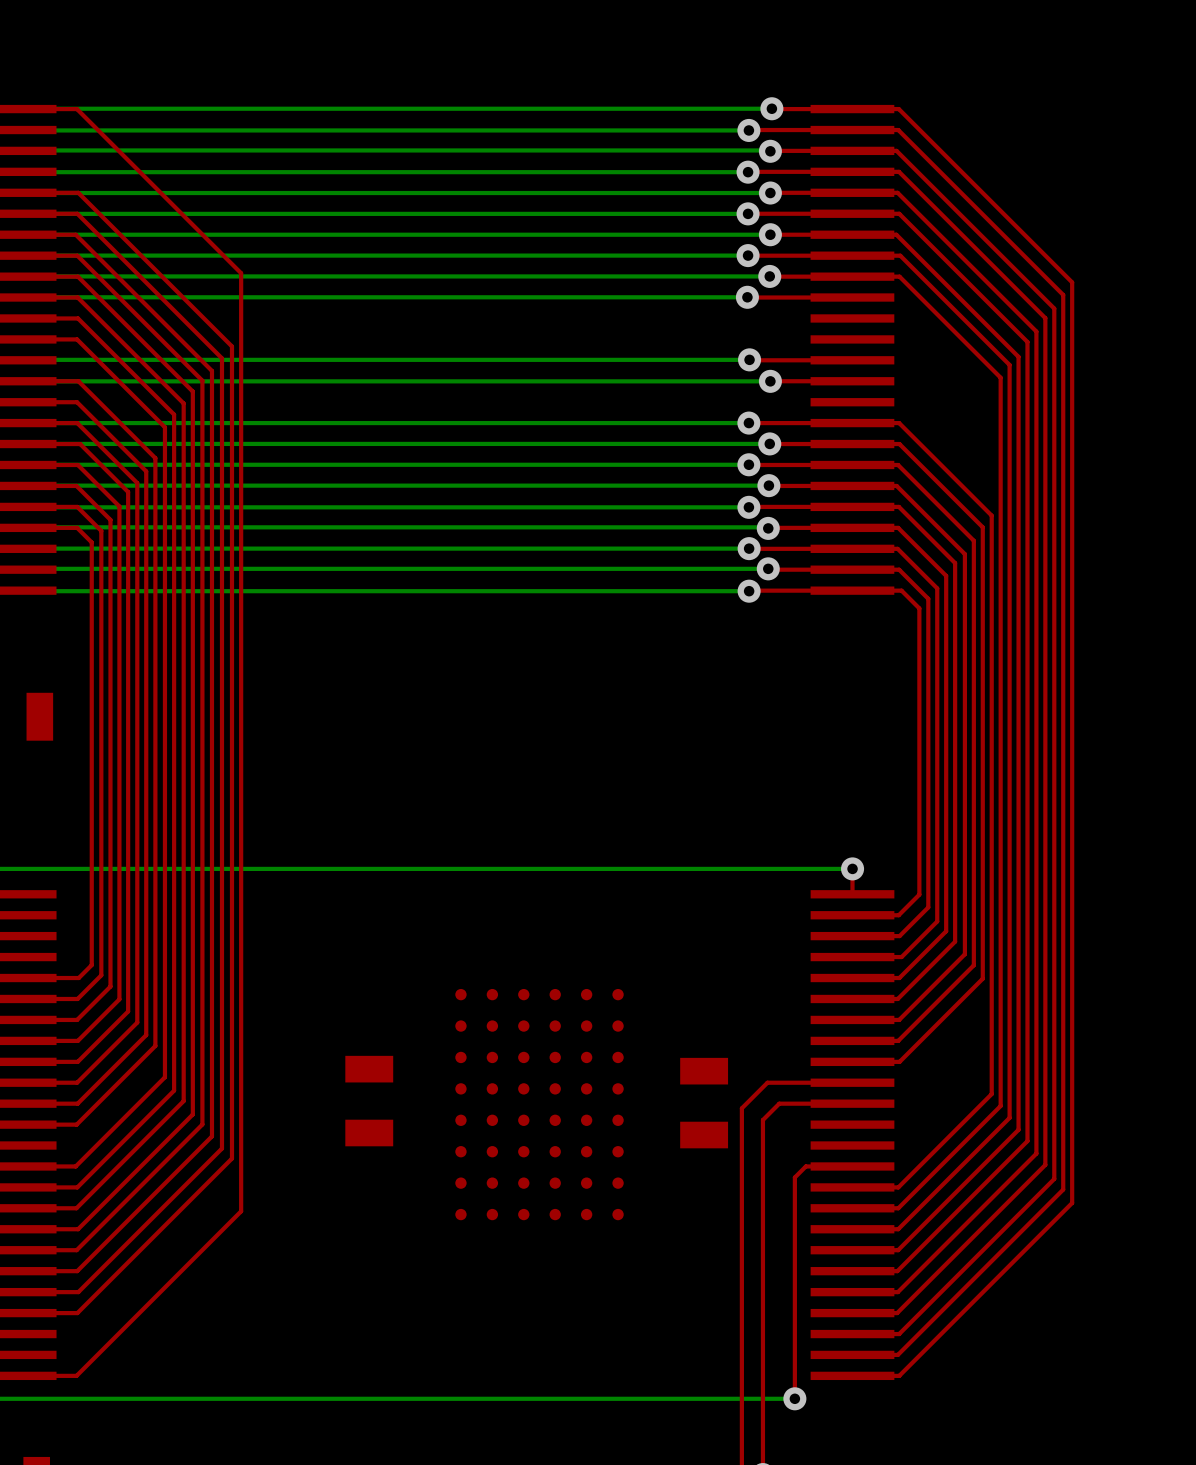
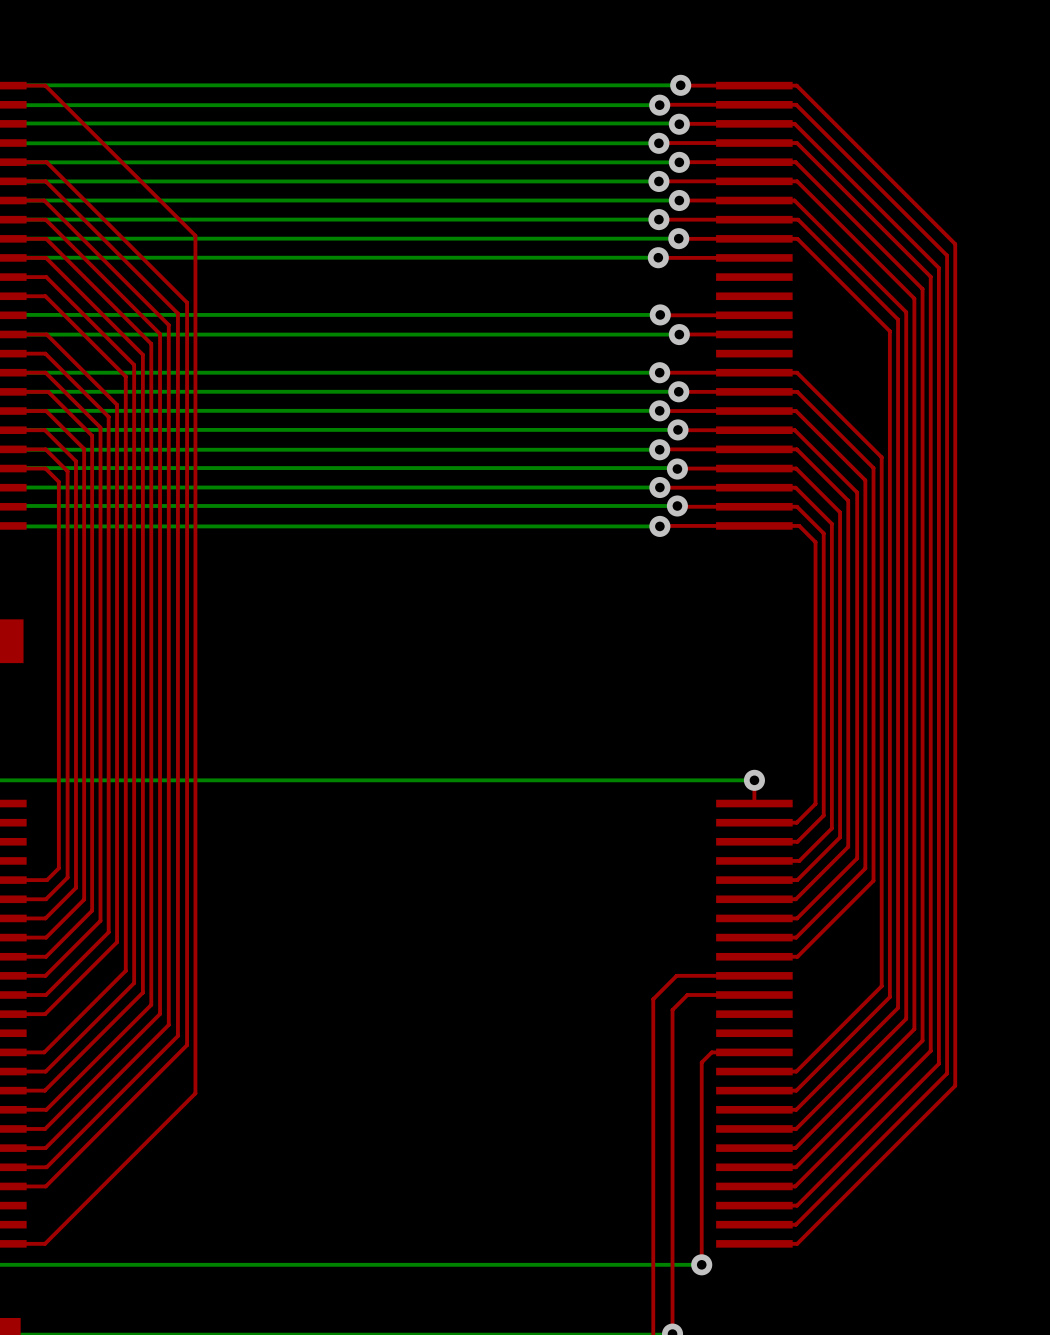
part: (369, 1101) -> none
part: (704, 1103) -> none
part: (539, 1104) -> none

